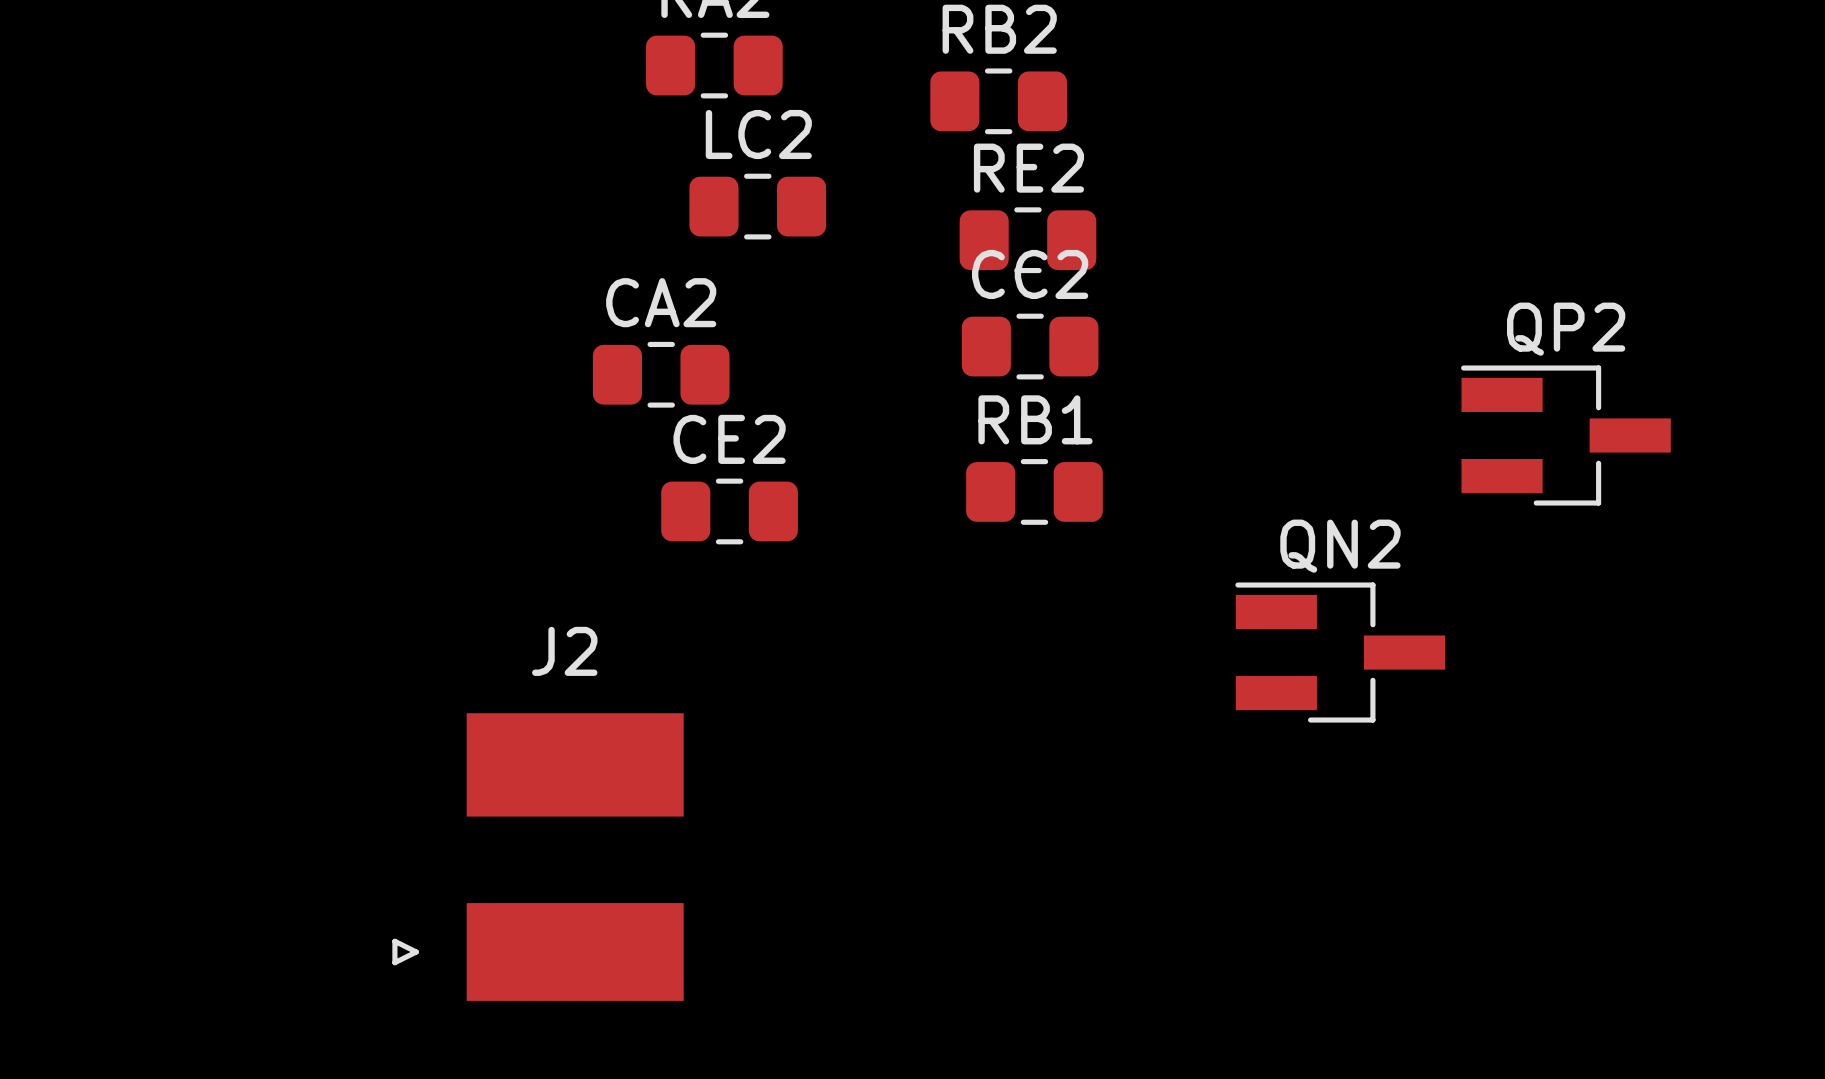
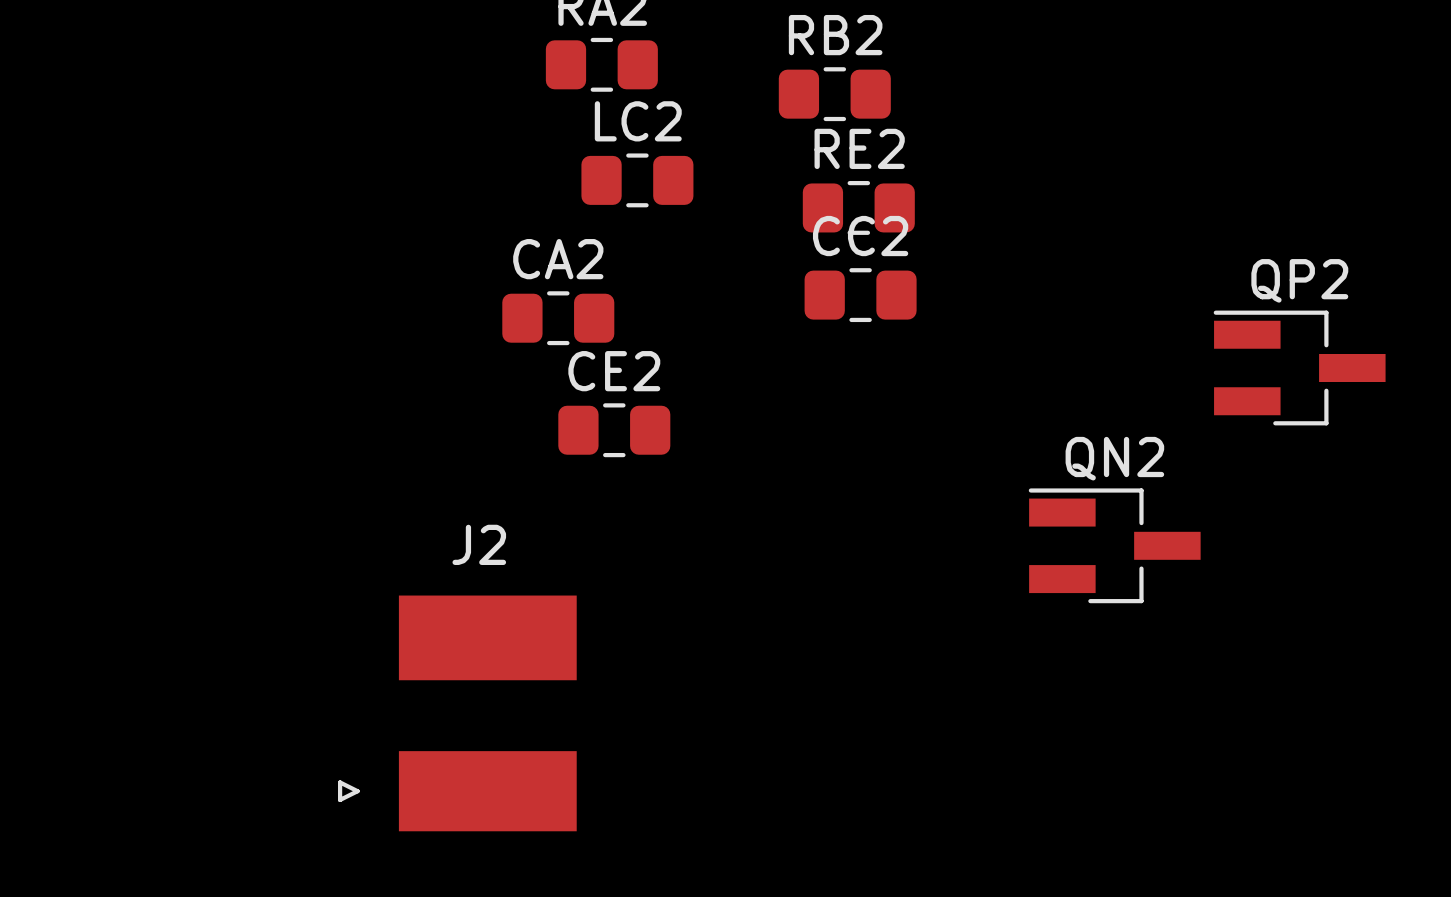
RB1: (1034, 491) -> none

